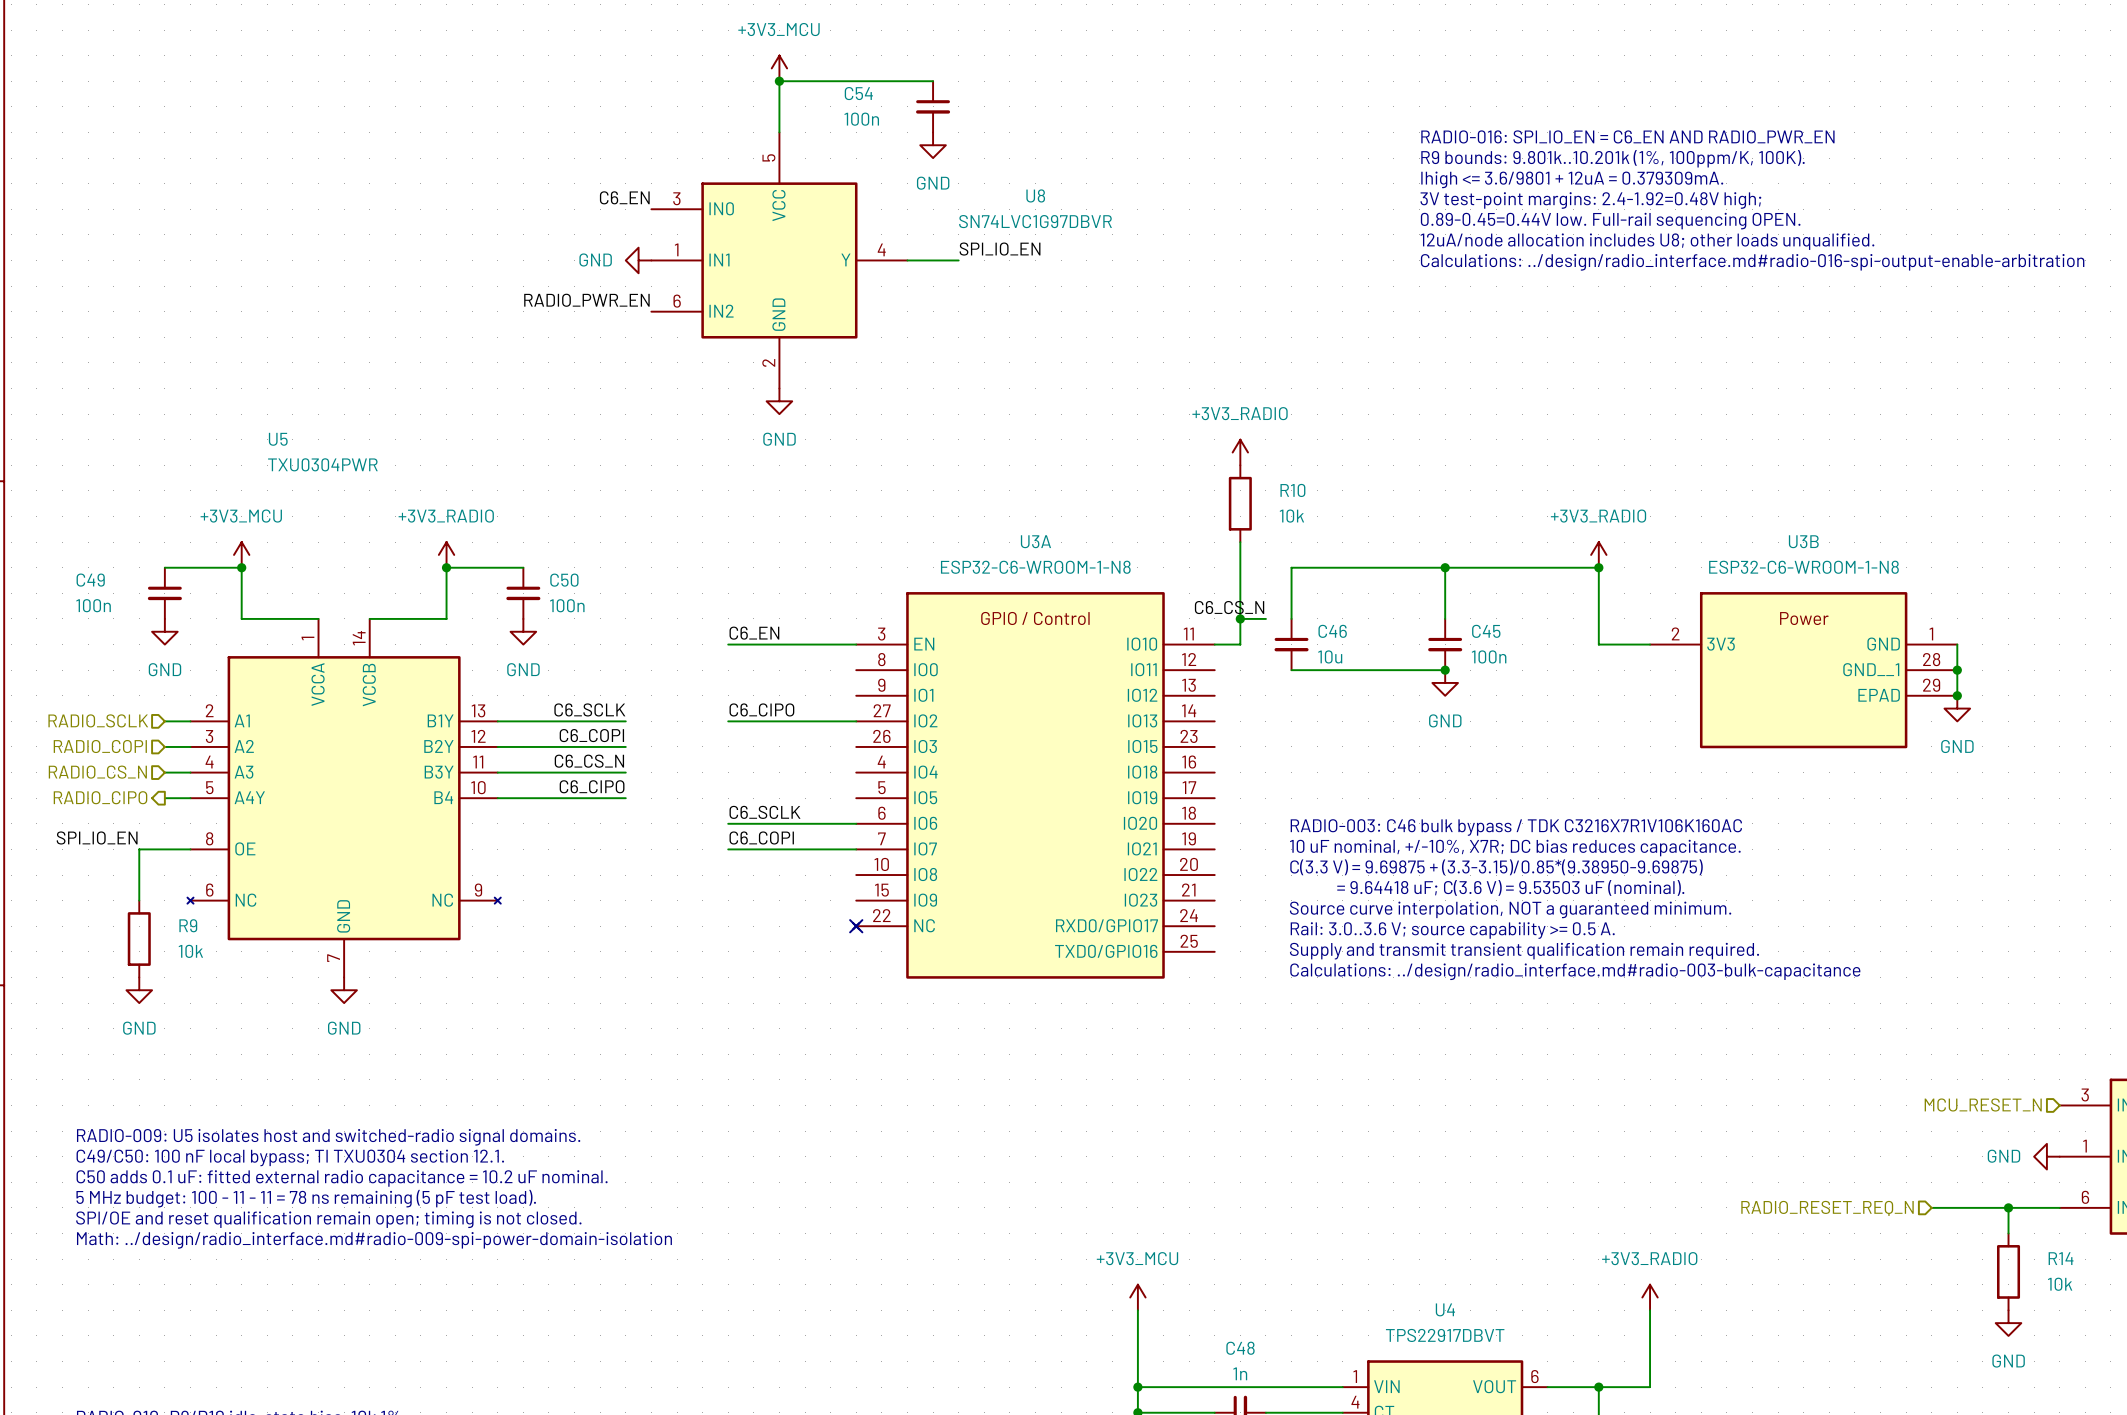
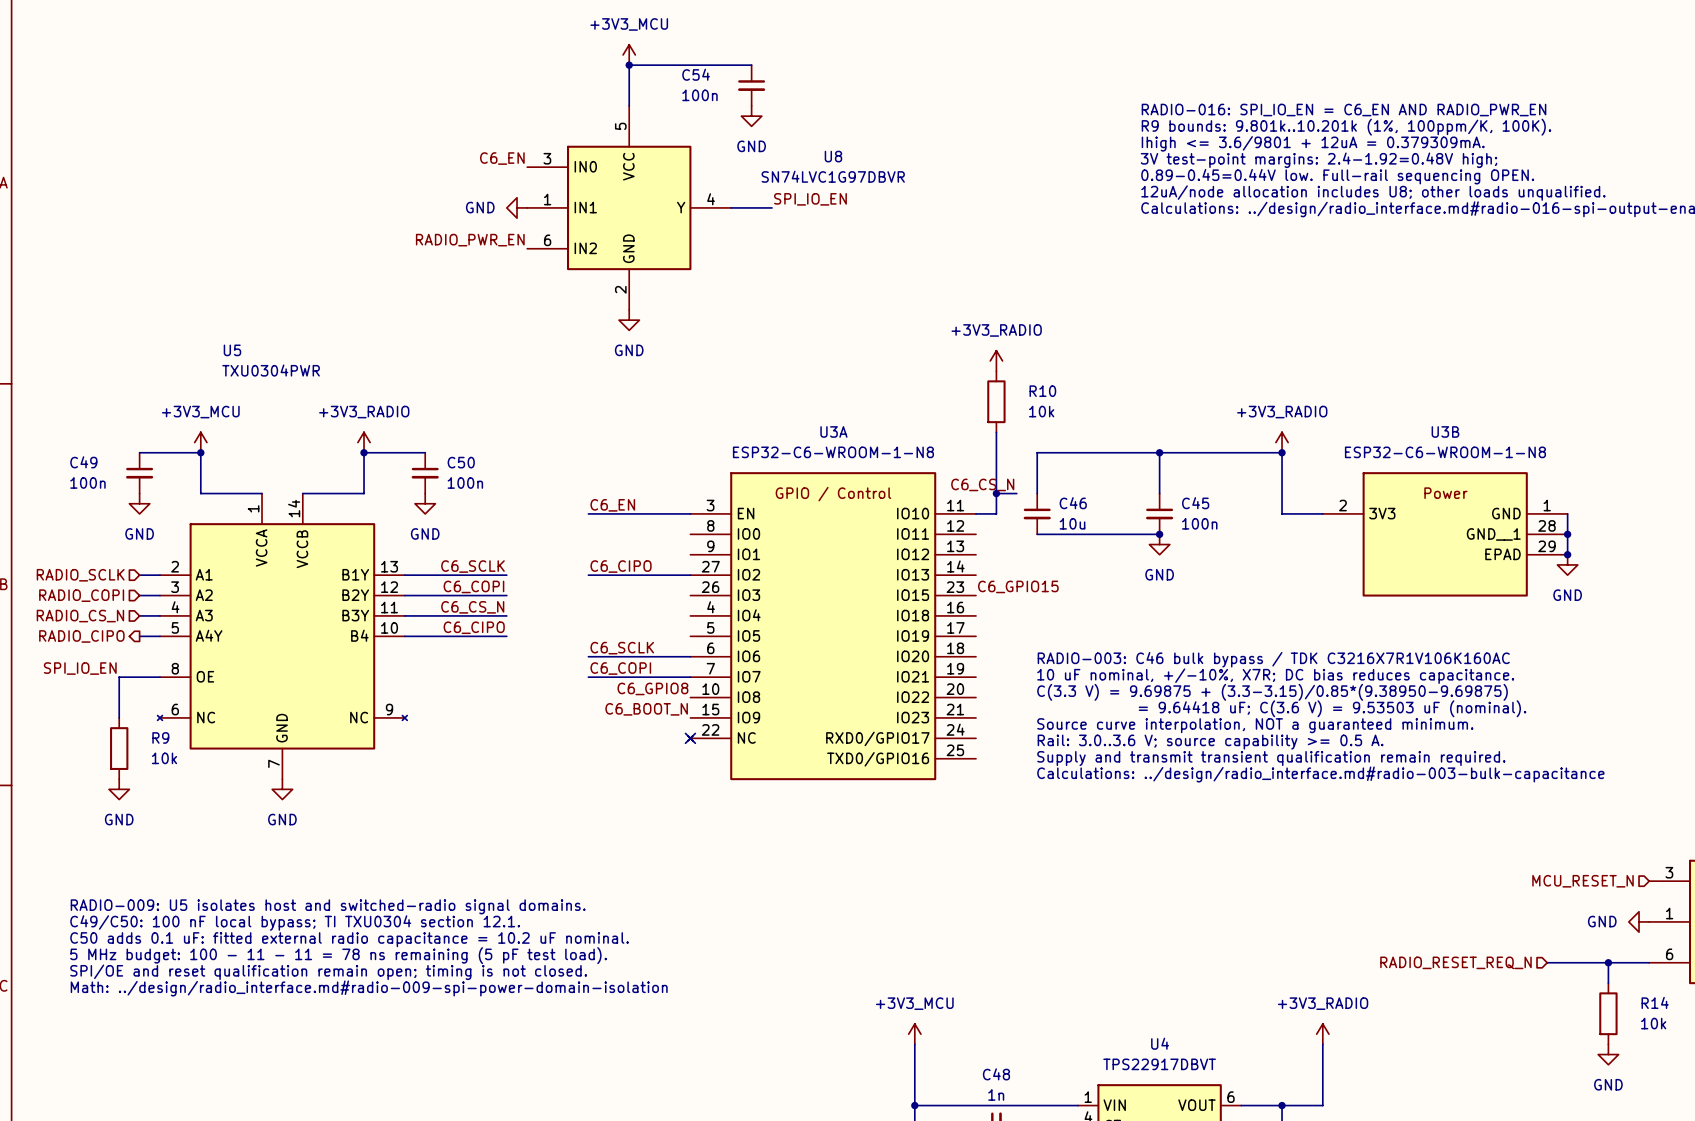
label: none -> C6_GPIO15 (1018, 586)
label: none -> C6_GPIO8 (652, 688)
label: none -> C6_BOOT_N (646, 709)

